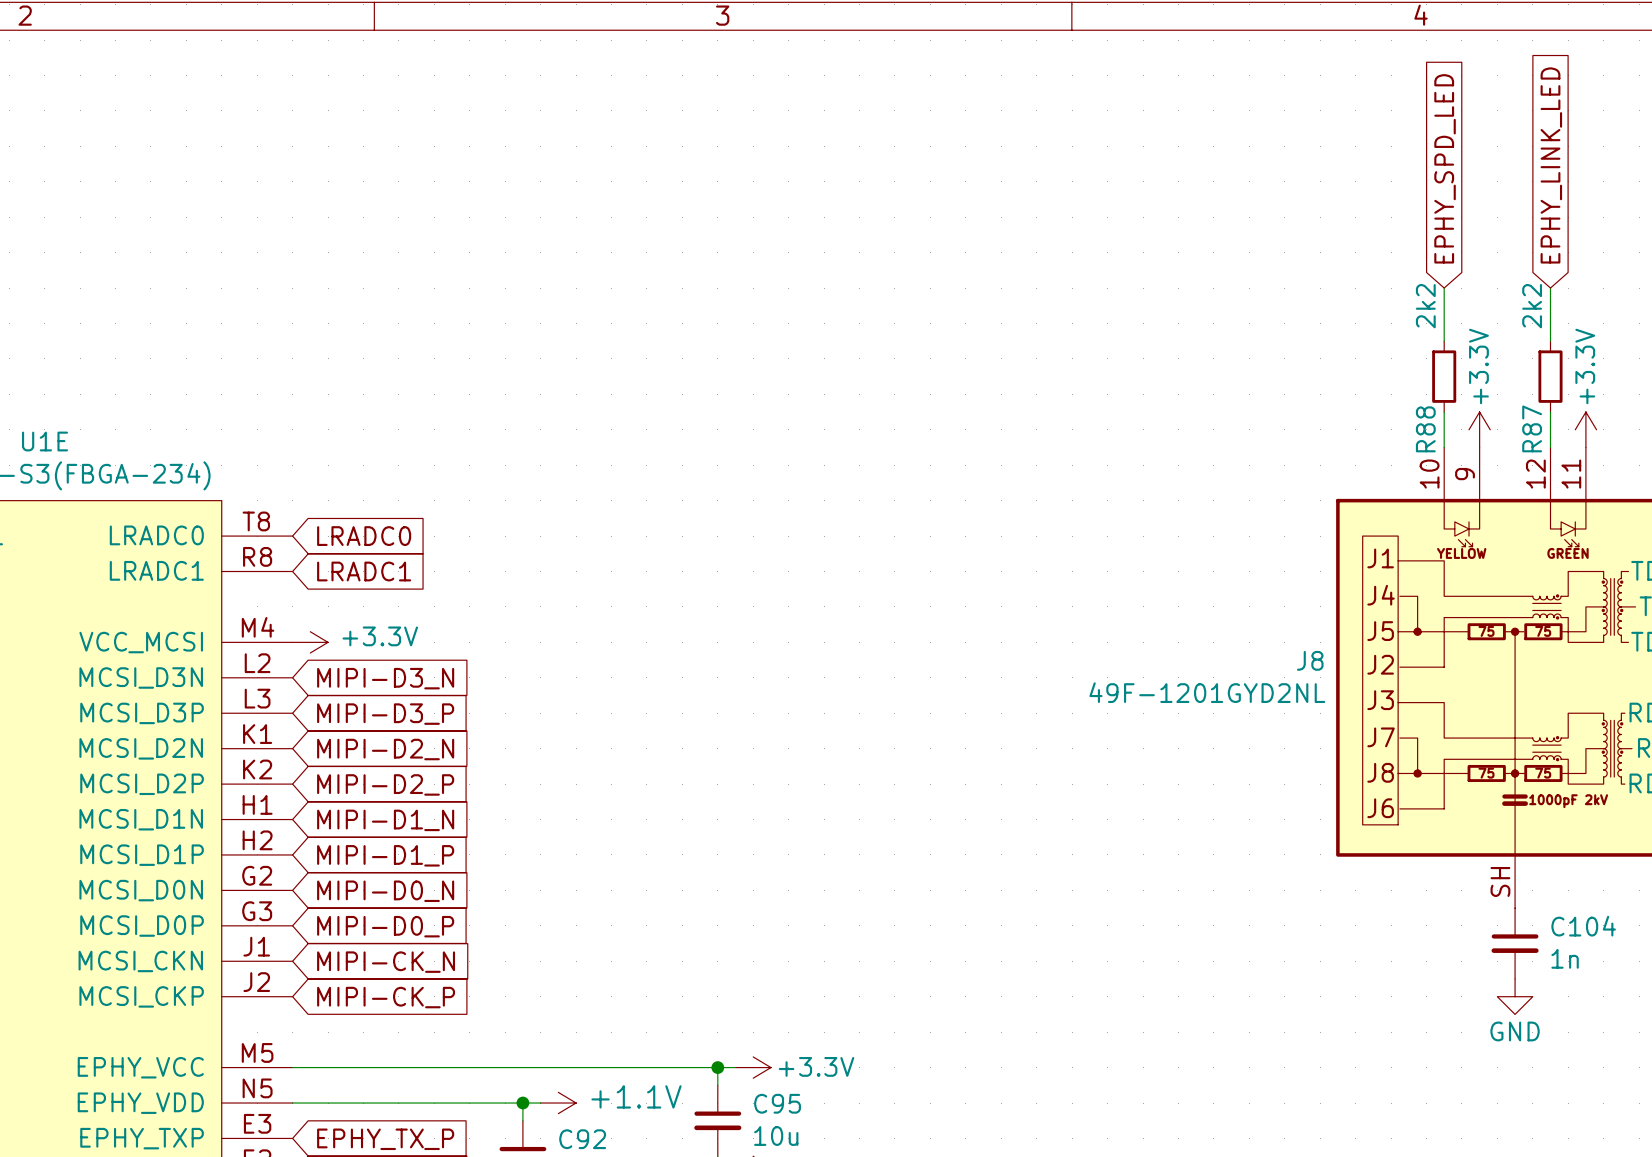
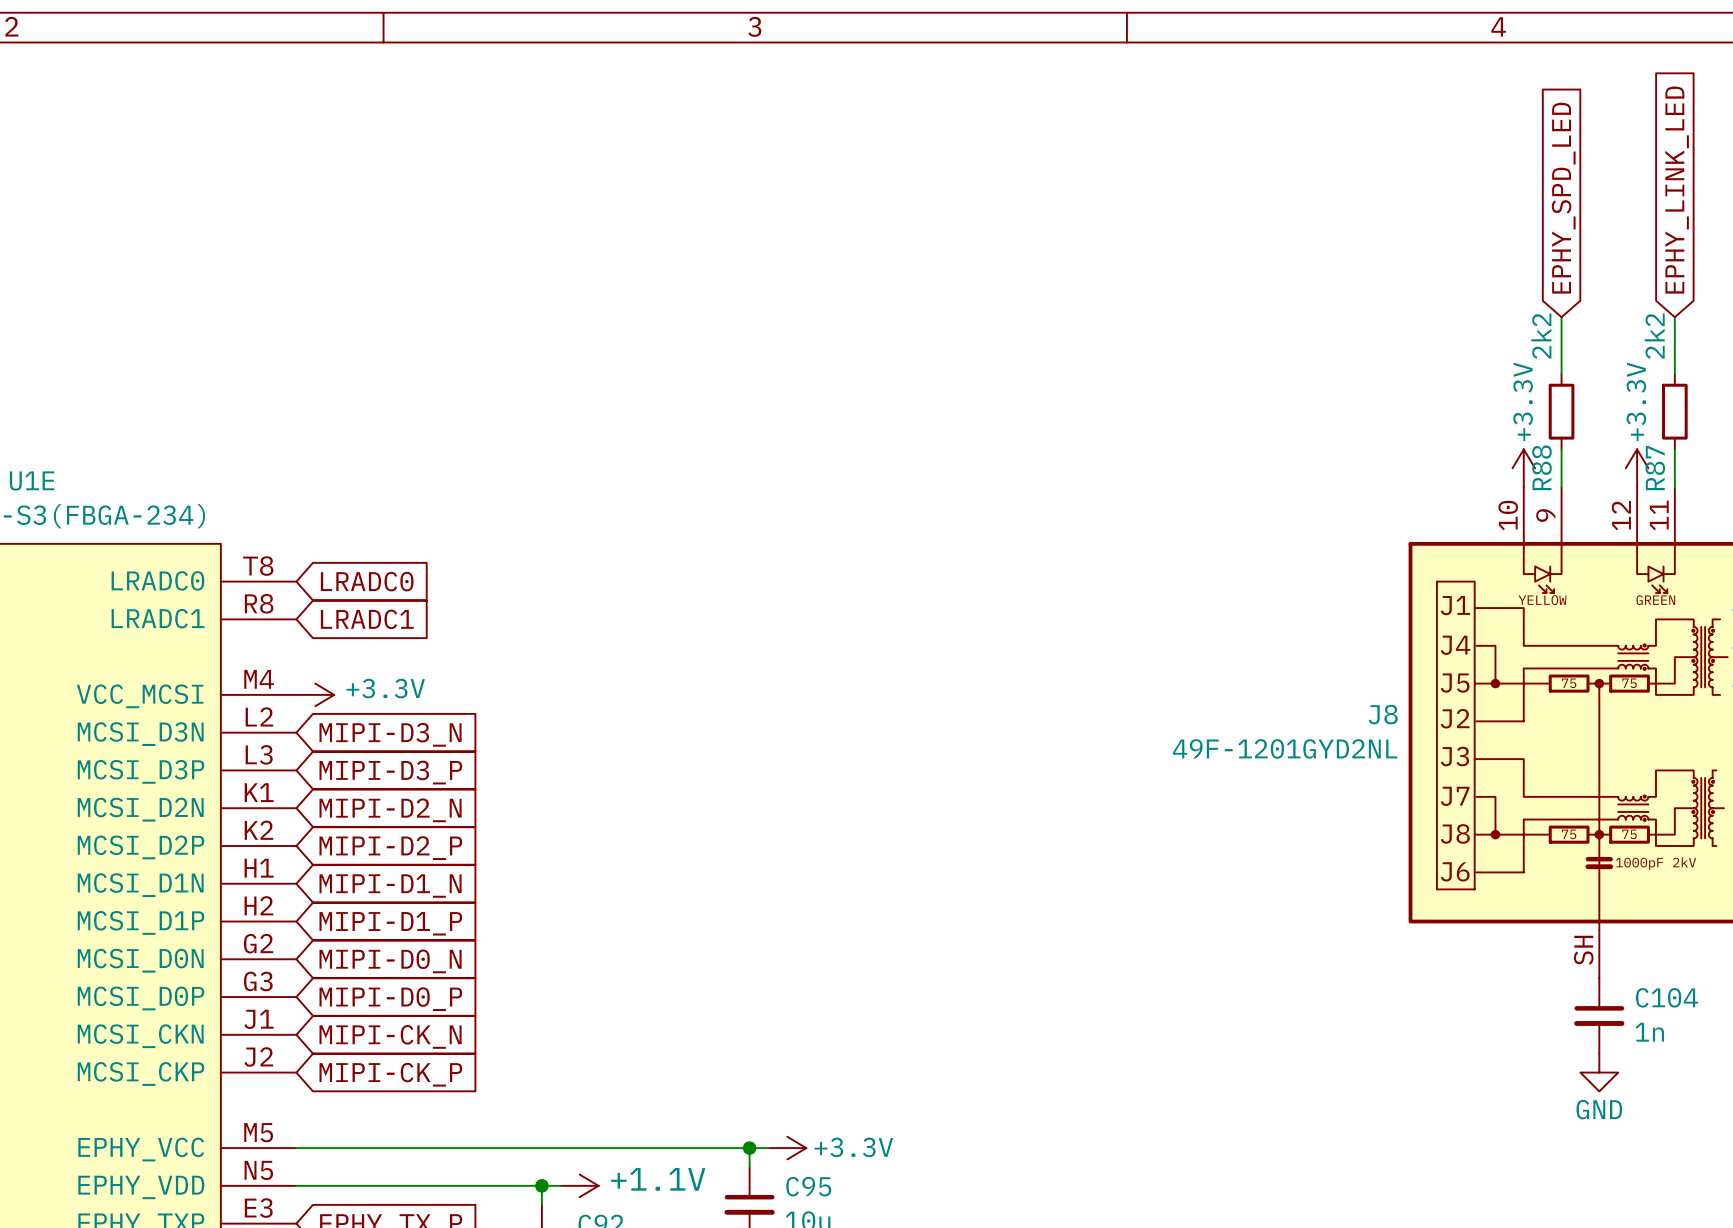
global label position: EPHY_LINK_LED (1551, 165) -> EPHY_LINK_LED (1677, 190)
global label position: EPHY_SPD_LED (1445, 168) -> EPHY_SPD_LED (1563, 198)
wire: (1444, 288) (1444, 341) -> (1561, 317) (1561, 373)
wire: (1550, 288) (1550, 341) -> (1674, 317) (1674, 373)
R88 position: (1444, 376) -> (1561, 411)
R87 position: (1550, 376) -> (1674, 411)
power symbol: none -> +3.3V (1523, 468)
power symbol: +3.3V (1479, 429) -> none
power symbol: none -> +3.3V (1637, 468)
power symbol: +3.3V (1585, 429) -> none

